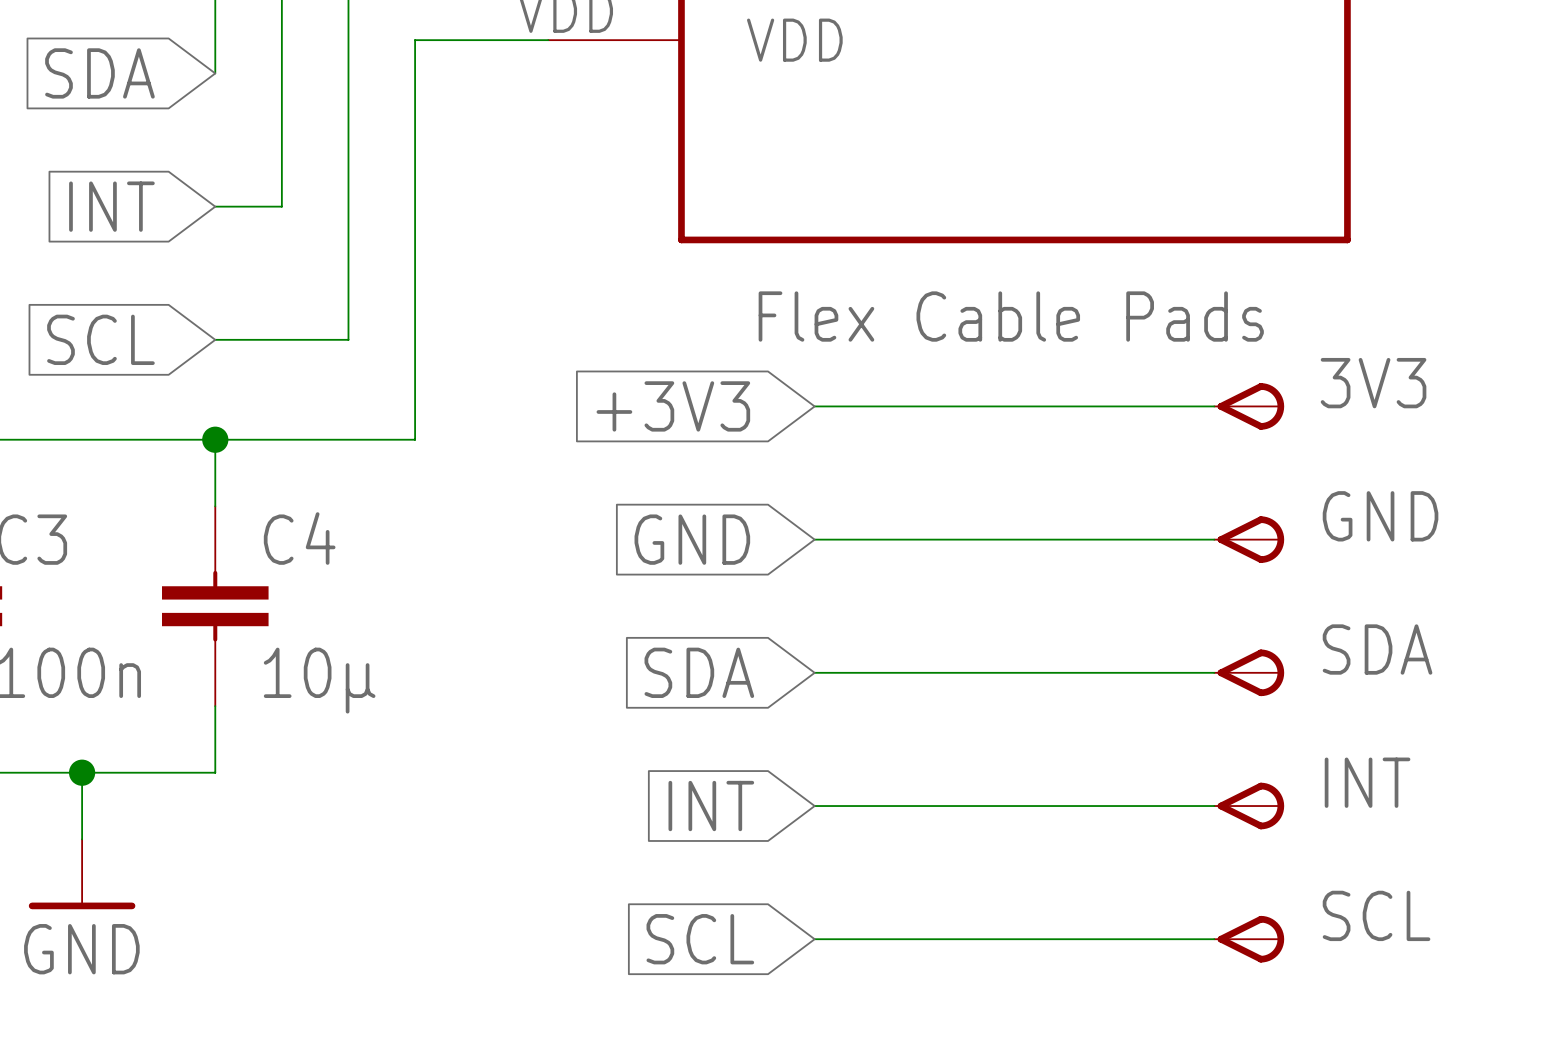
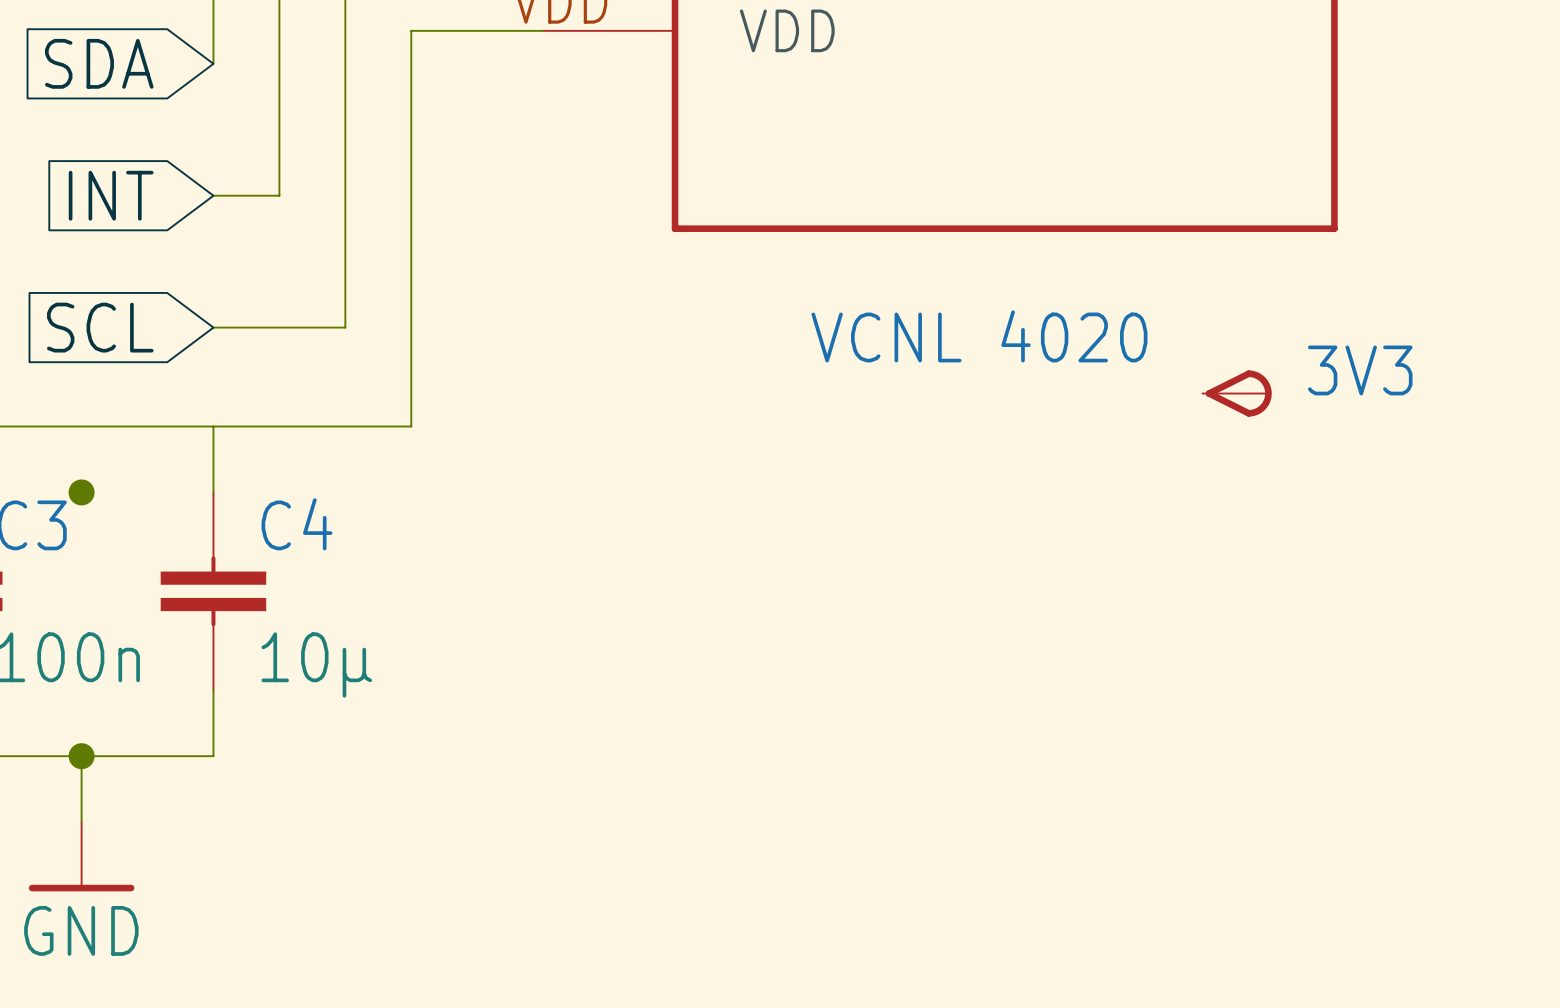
text: Flex Cable Pads (1011, 316) -> none
text: none -> VCNL 4020 (979, 336)
global label: +3V3 (673, 406) -> none
wire: (814, 406) (1214, 406) -> none
junction: (215, 439) -> none
junction: none -> (81, 492)
global label: GND (692, 539) -> none
wire: (814, 539) (1214, 539) -> none
GND: (1249, 539) -> none
global label: SDA (699, 672) -> none
wire: (814, 672) (1214, 672) -> none
SDA: (1249, 672) -> none
global label: INT (711, 806) -> none
wire: (814, 806) (1214, 806) -> none
INT: (1249, 806) -> none
global label: SCL (700, 939) -> none
wire: (814, 939) (1214, 939) -> none
SCL: (1249, 939) -> none

